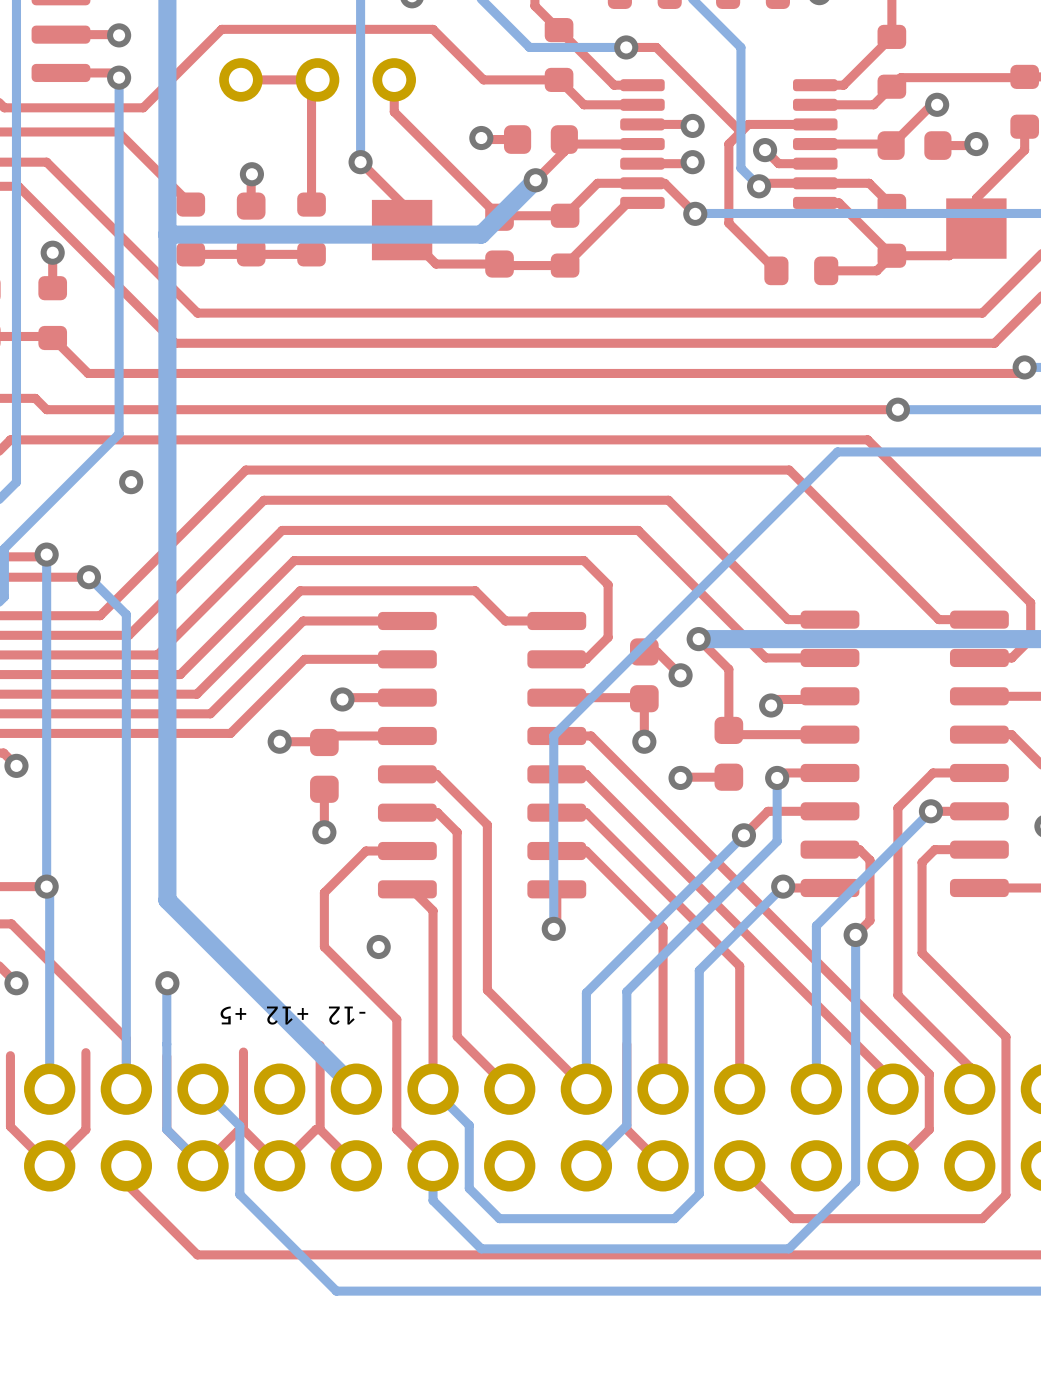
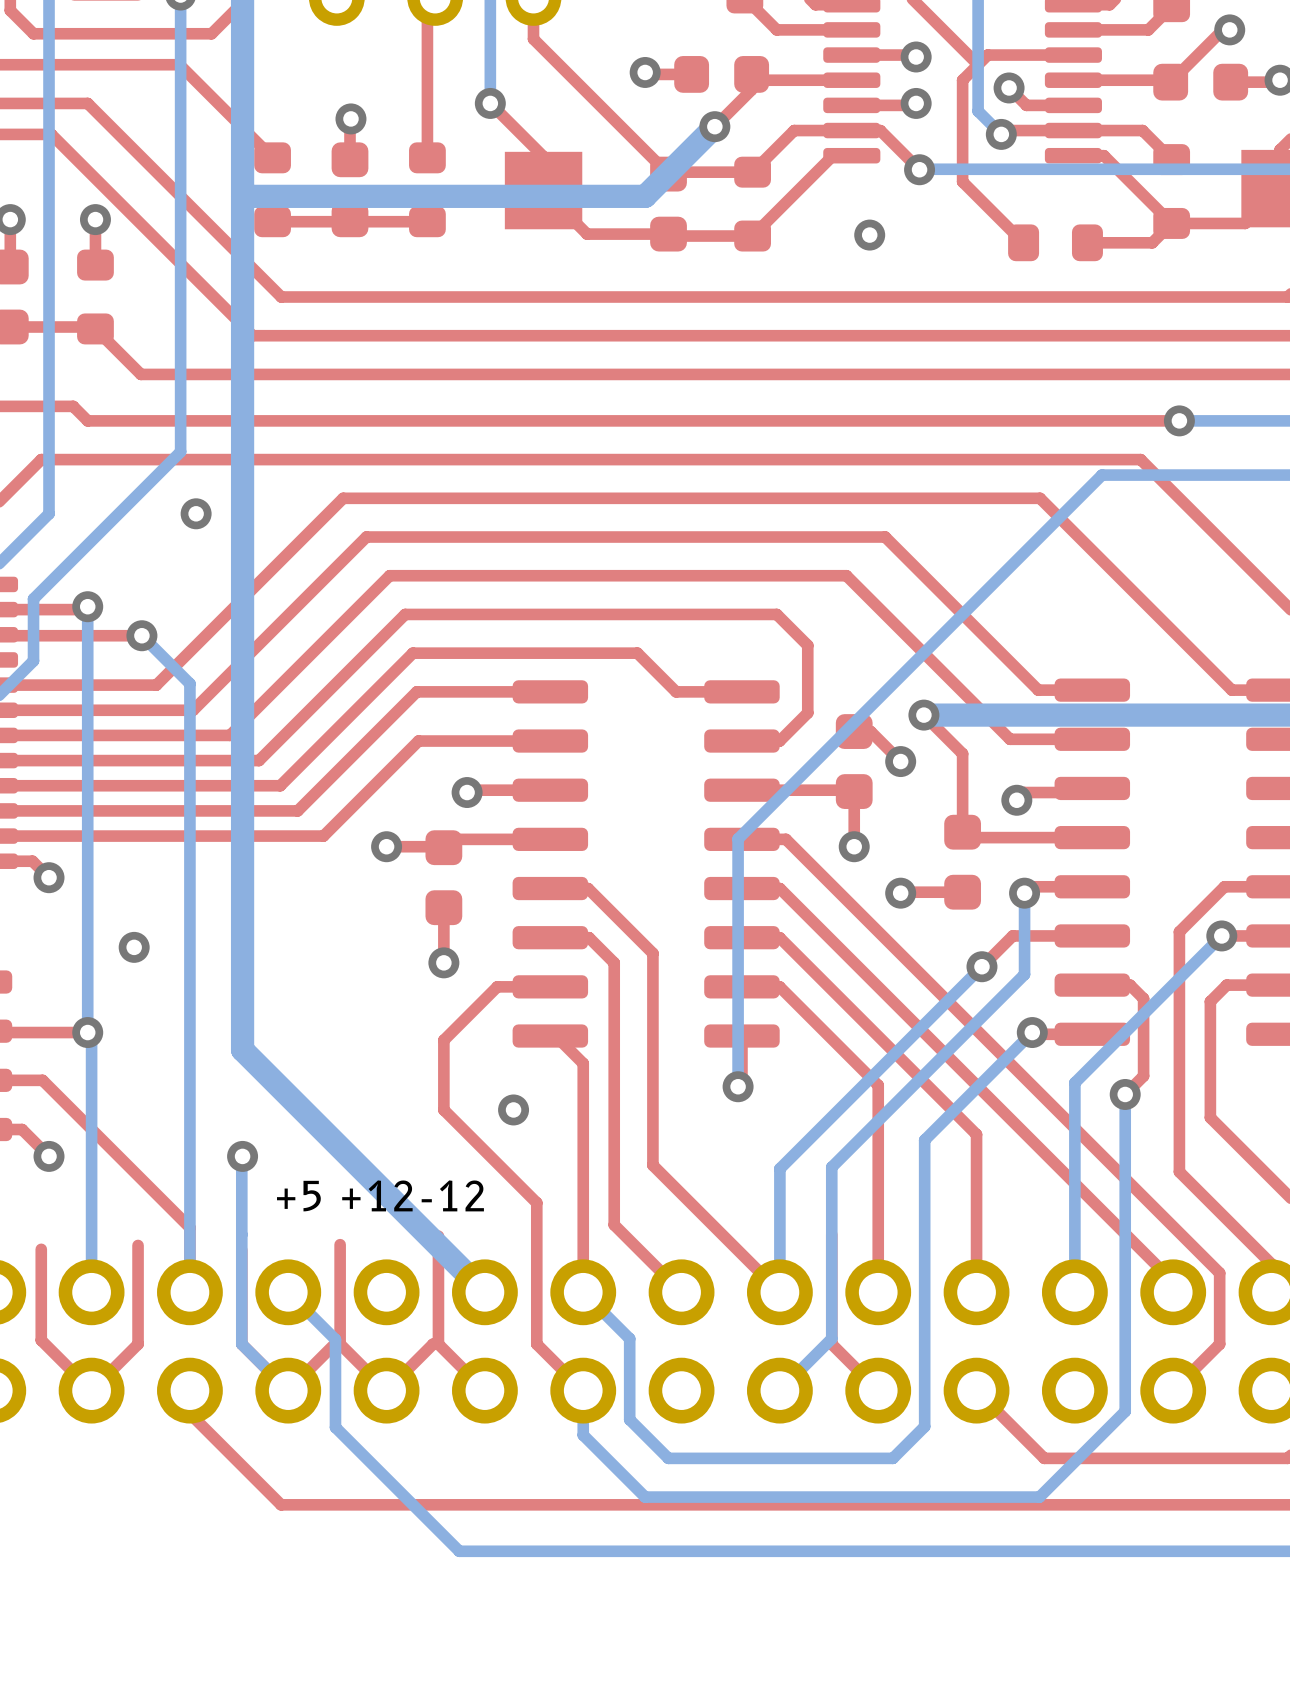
via: none -> (869, 235)
via: none -> (134, 947)
text: -12 +12 +5 (292, 1015) -> +5 +12-12 (380, 1195)

